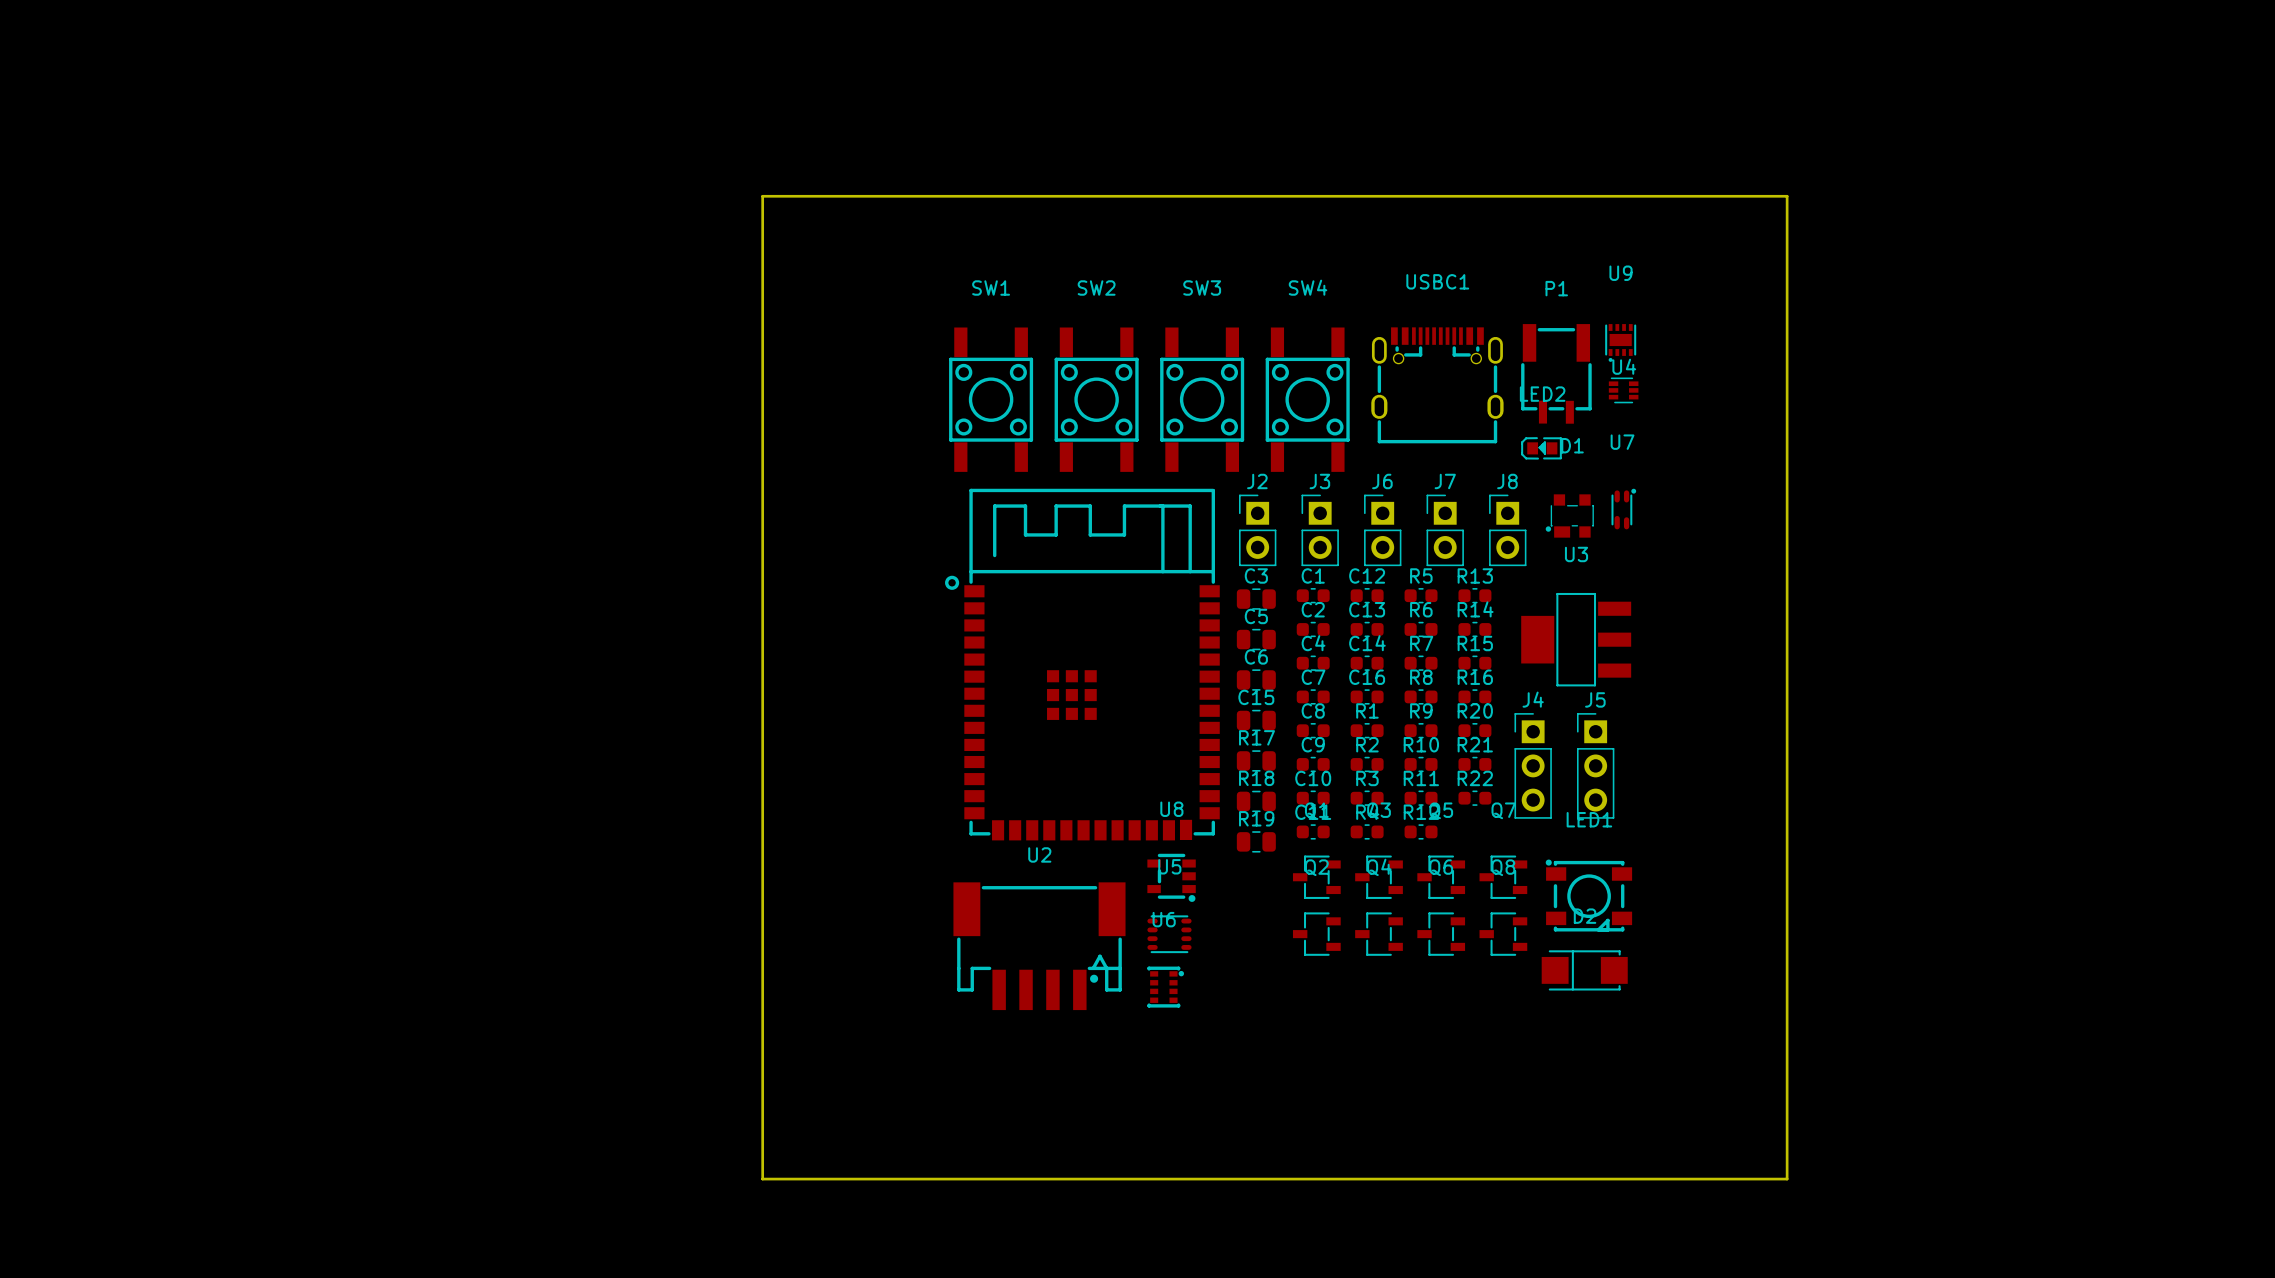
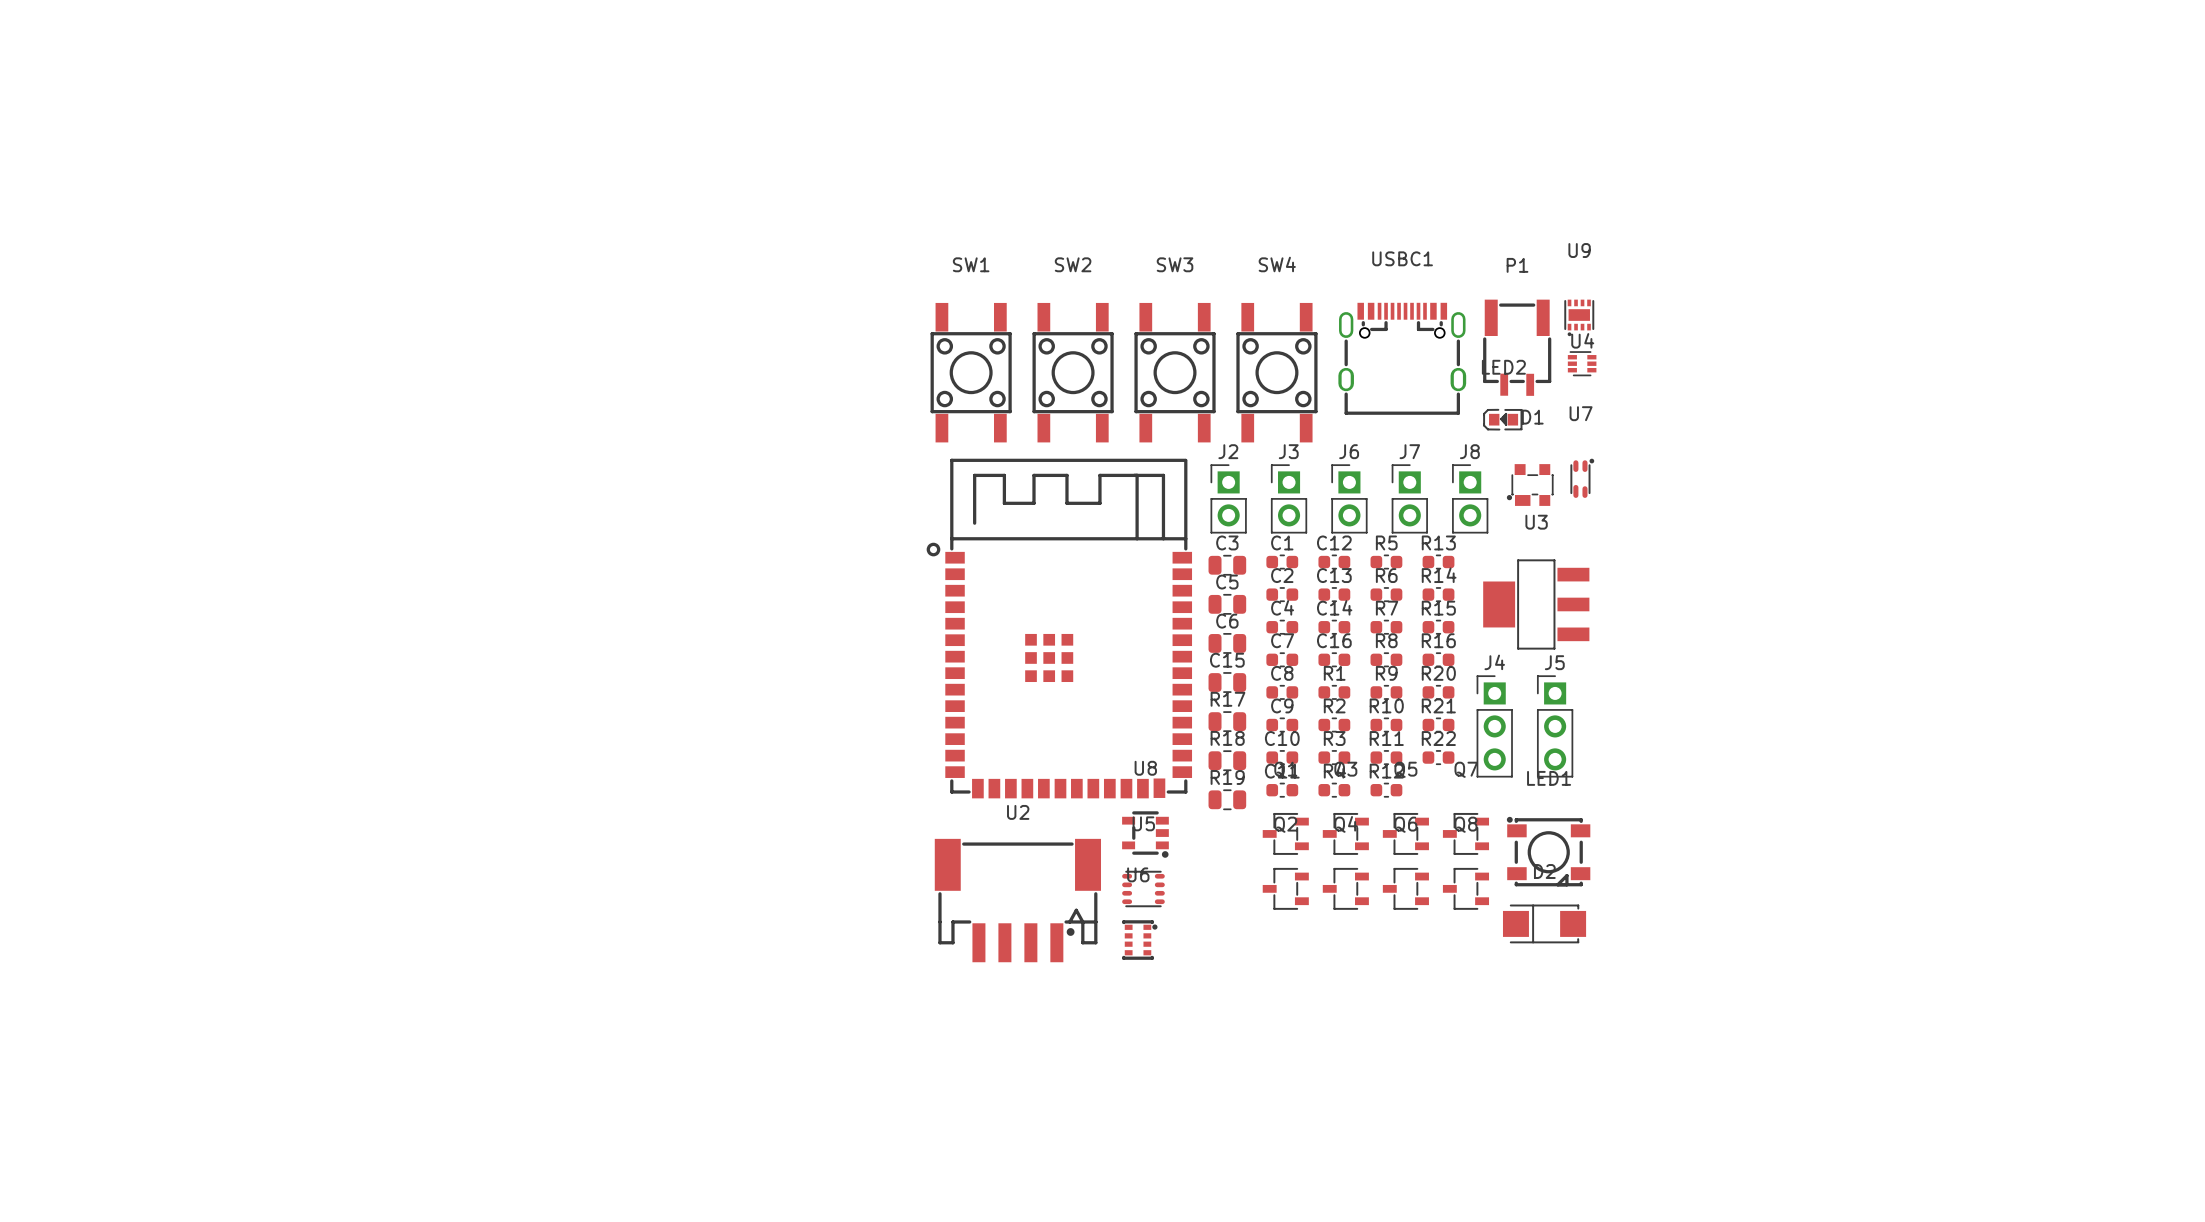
board edge: (762, 196) (1787, 196) (1787, 1179) (762, 1179) (762, 196) -> none

